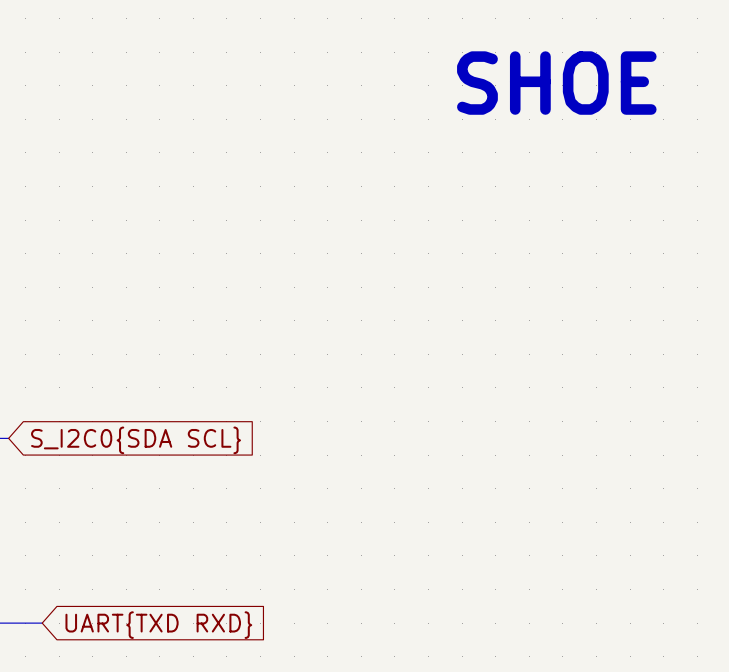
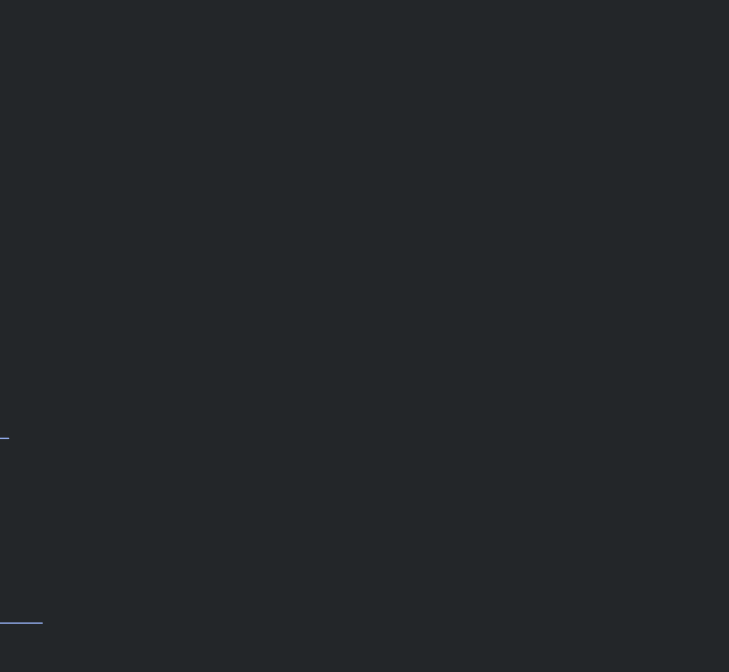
text: SHOE (556, 83) -> none
global label: S_I2C0{SDA SCL} (136, 440) -> none
global label: UART{TXD RXD} (158, 625) -> none

